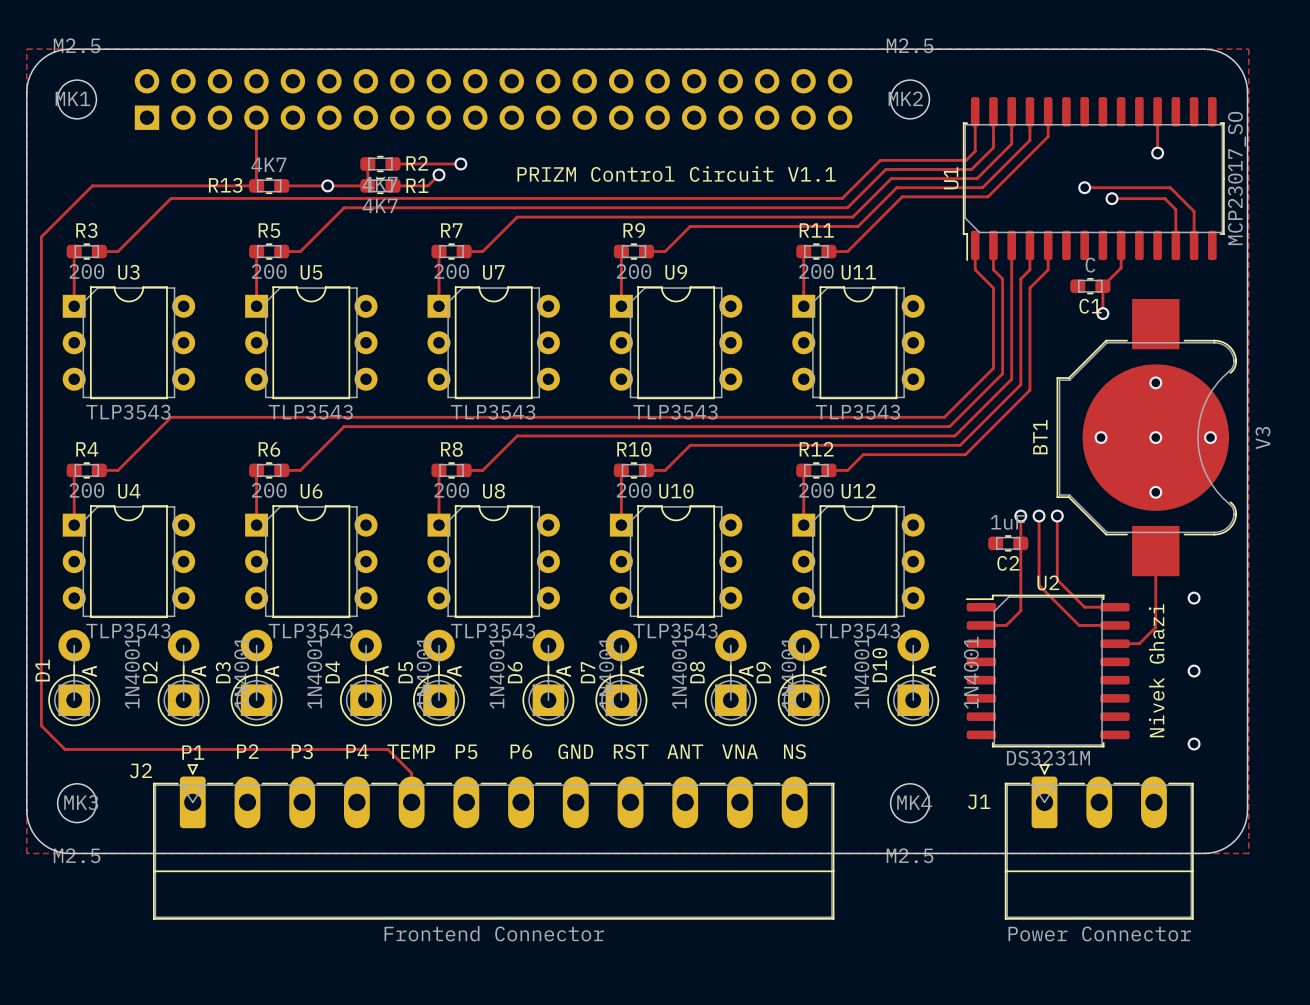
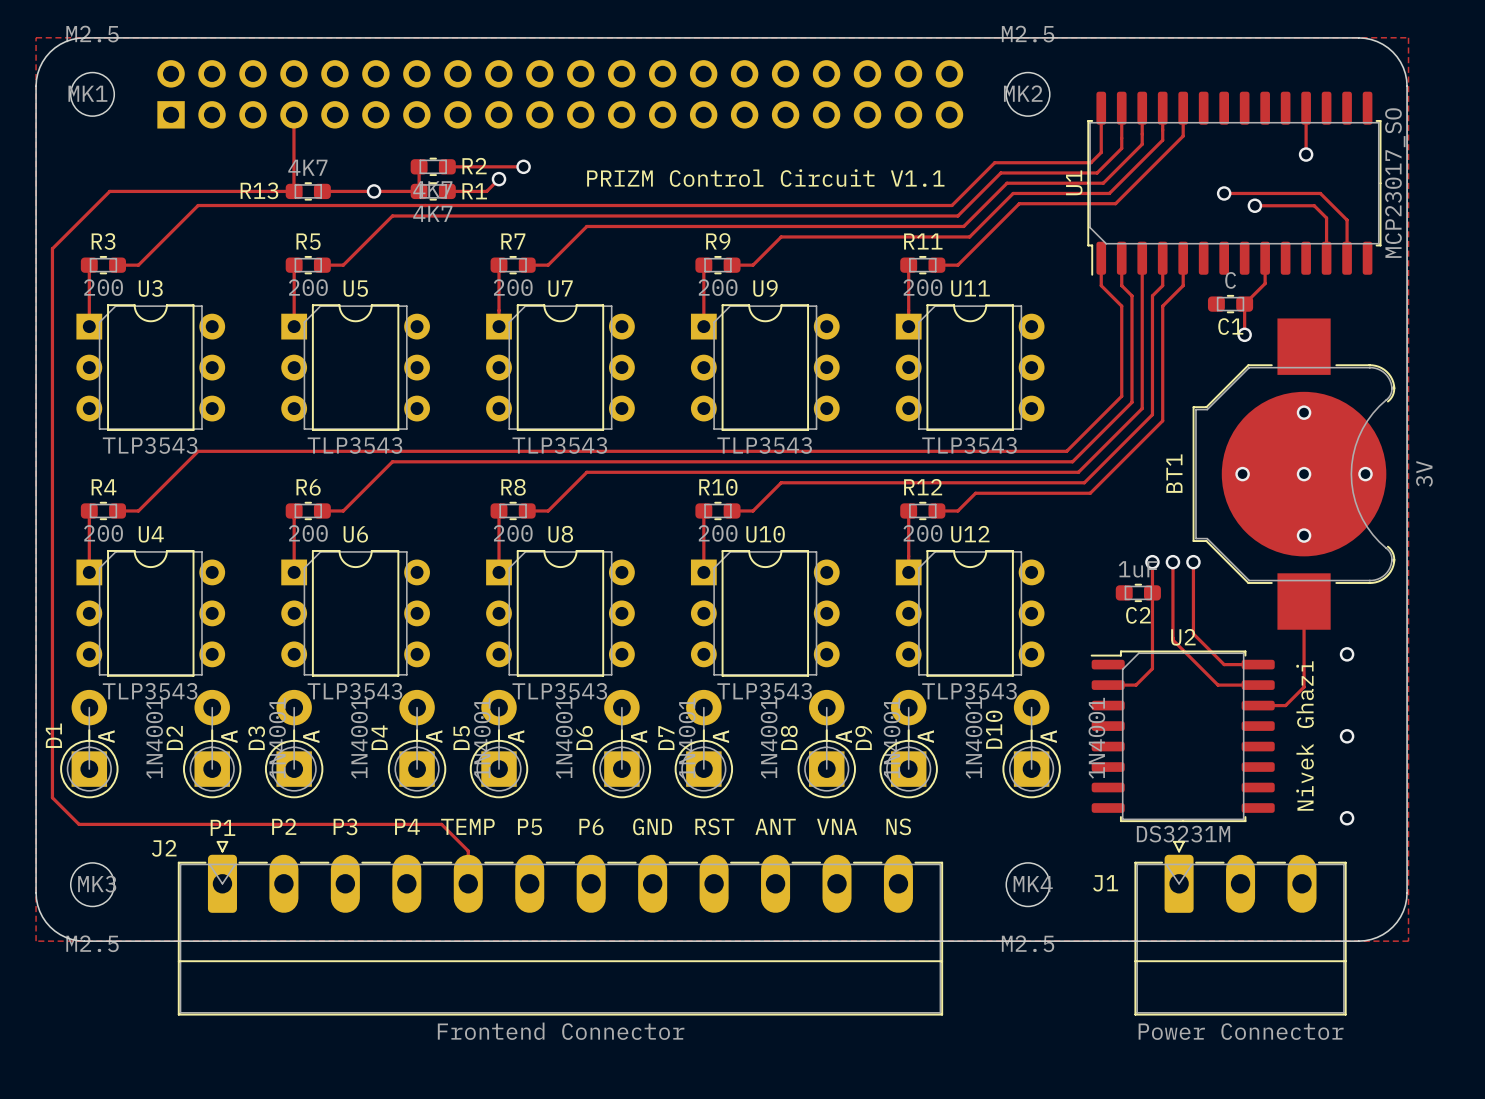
BT1 value: V3 (1262, 438) -> 3V (1424, 473)

